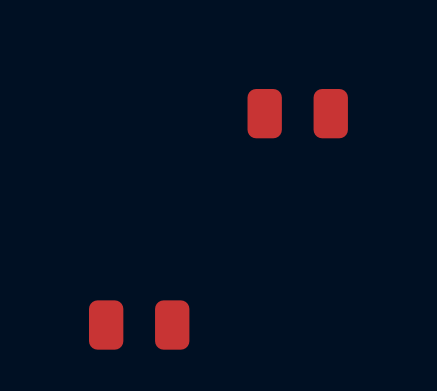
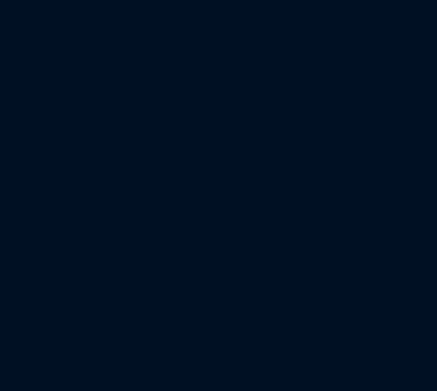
part: (297, 113) -> none
part: (139, 325) -> none

